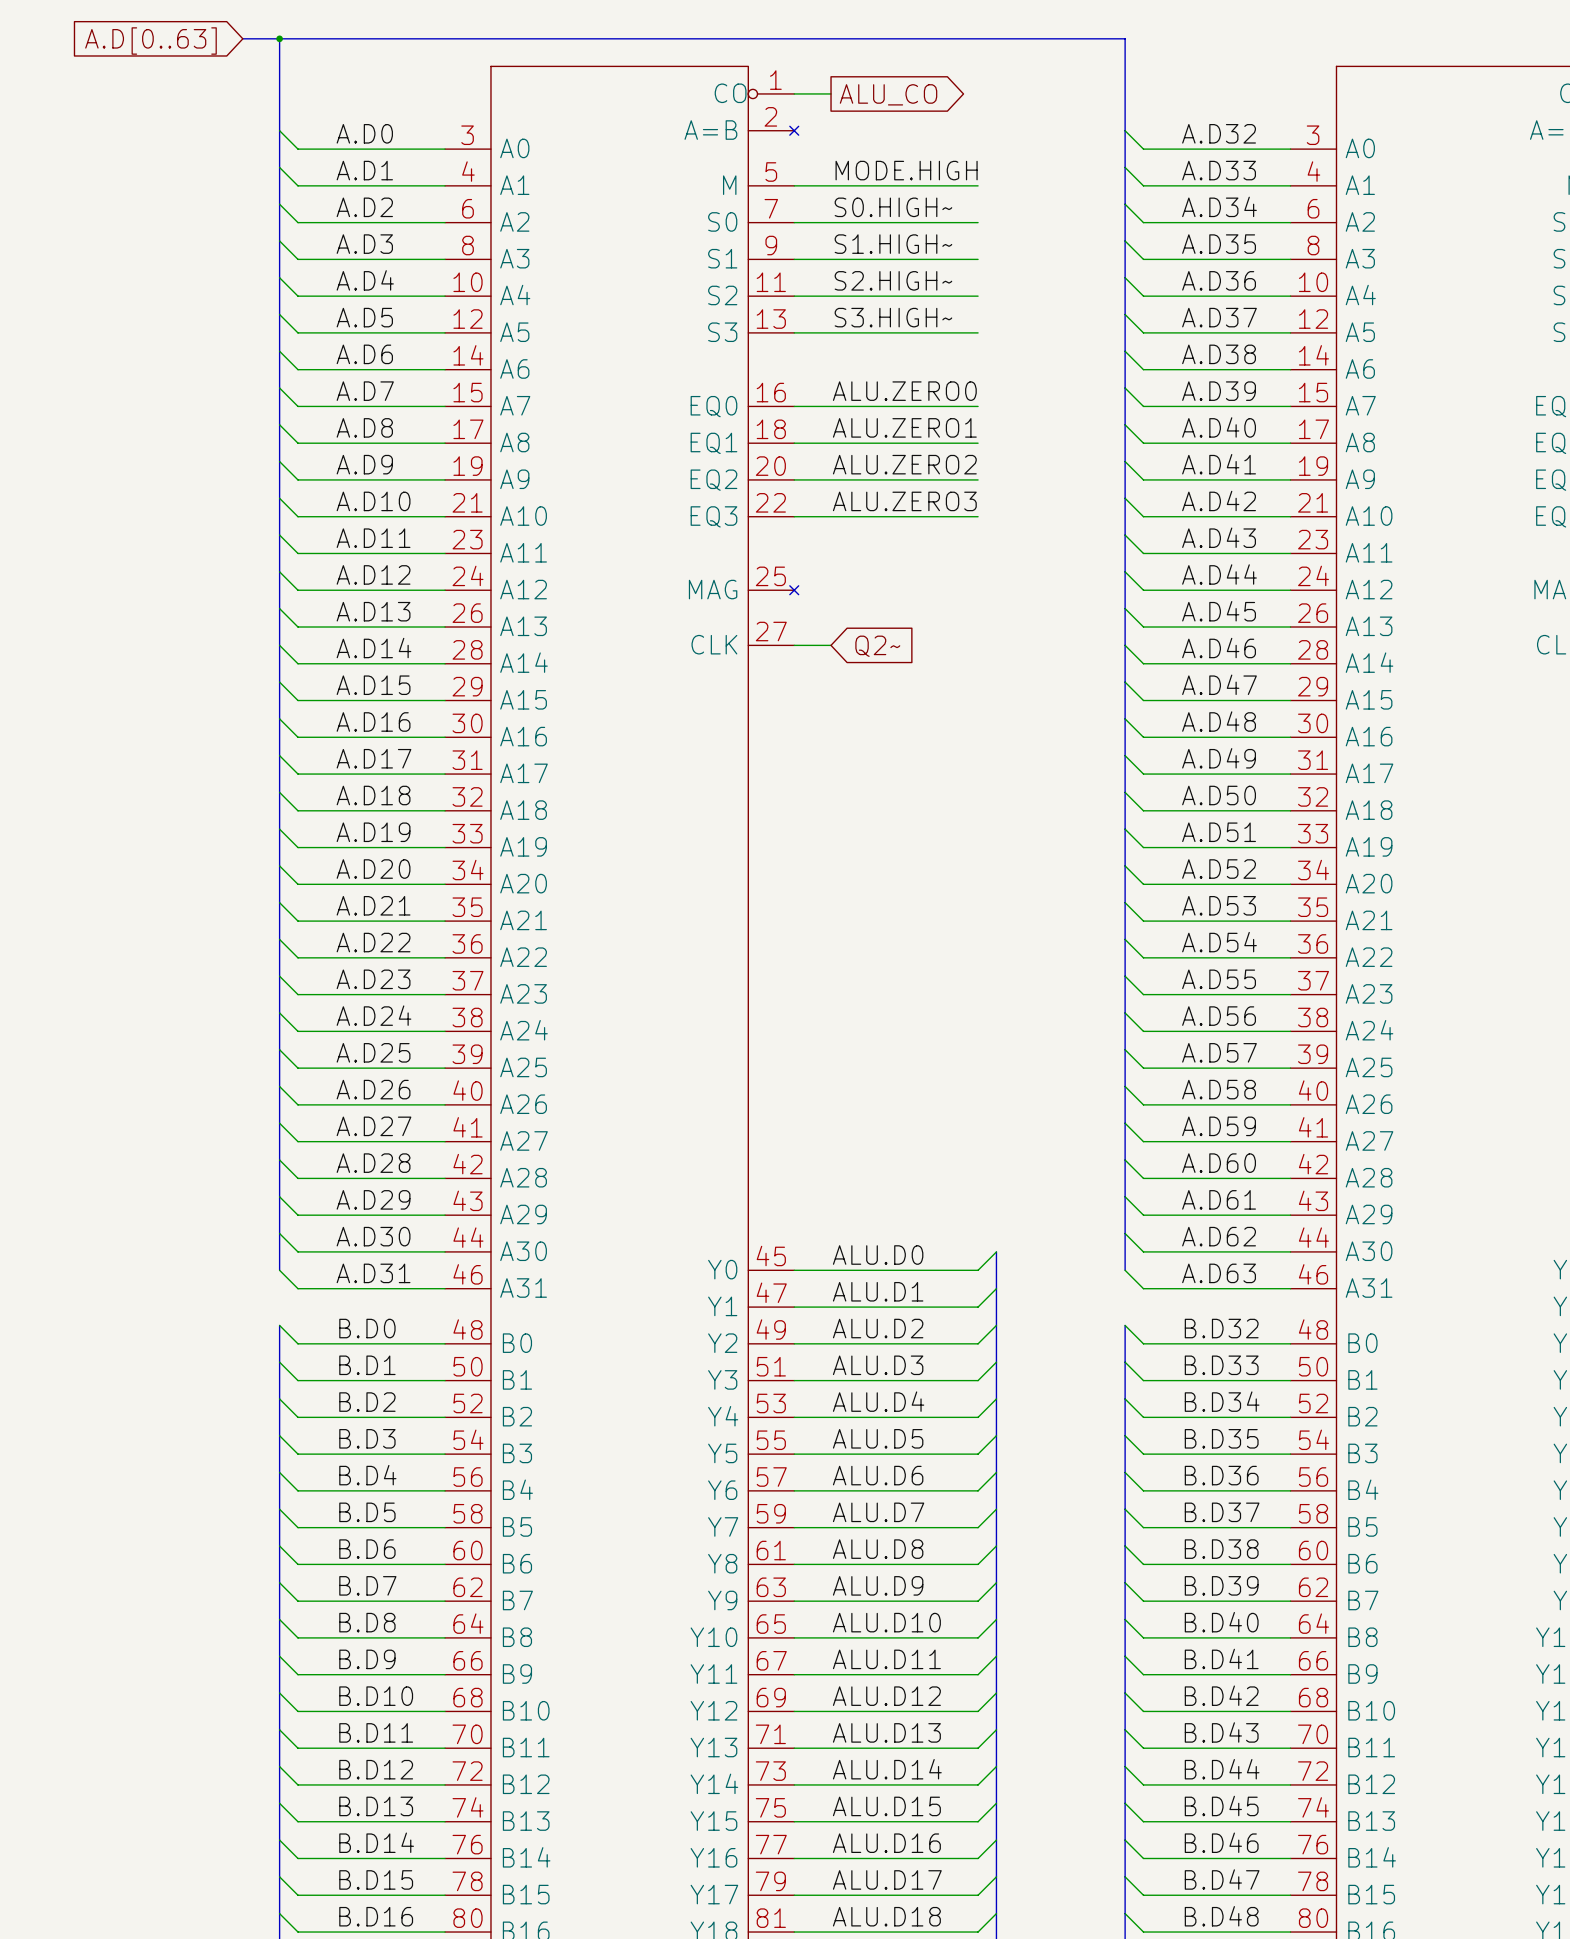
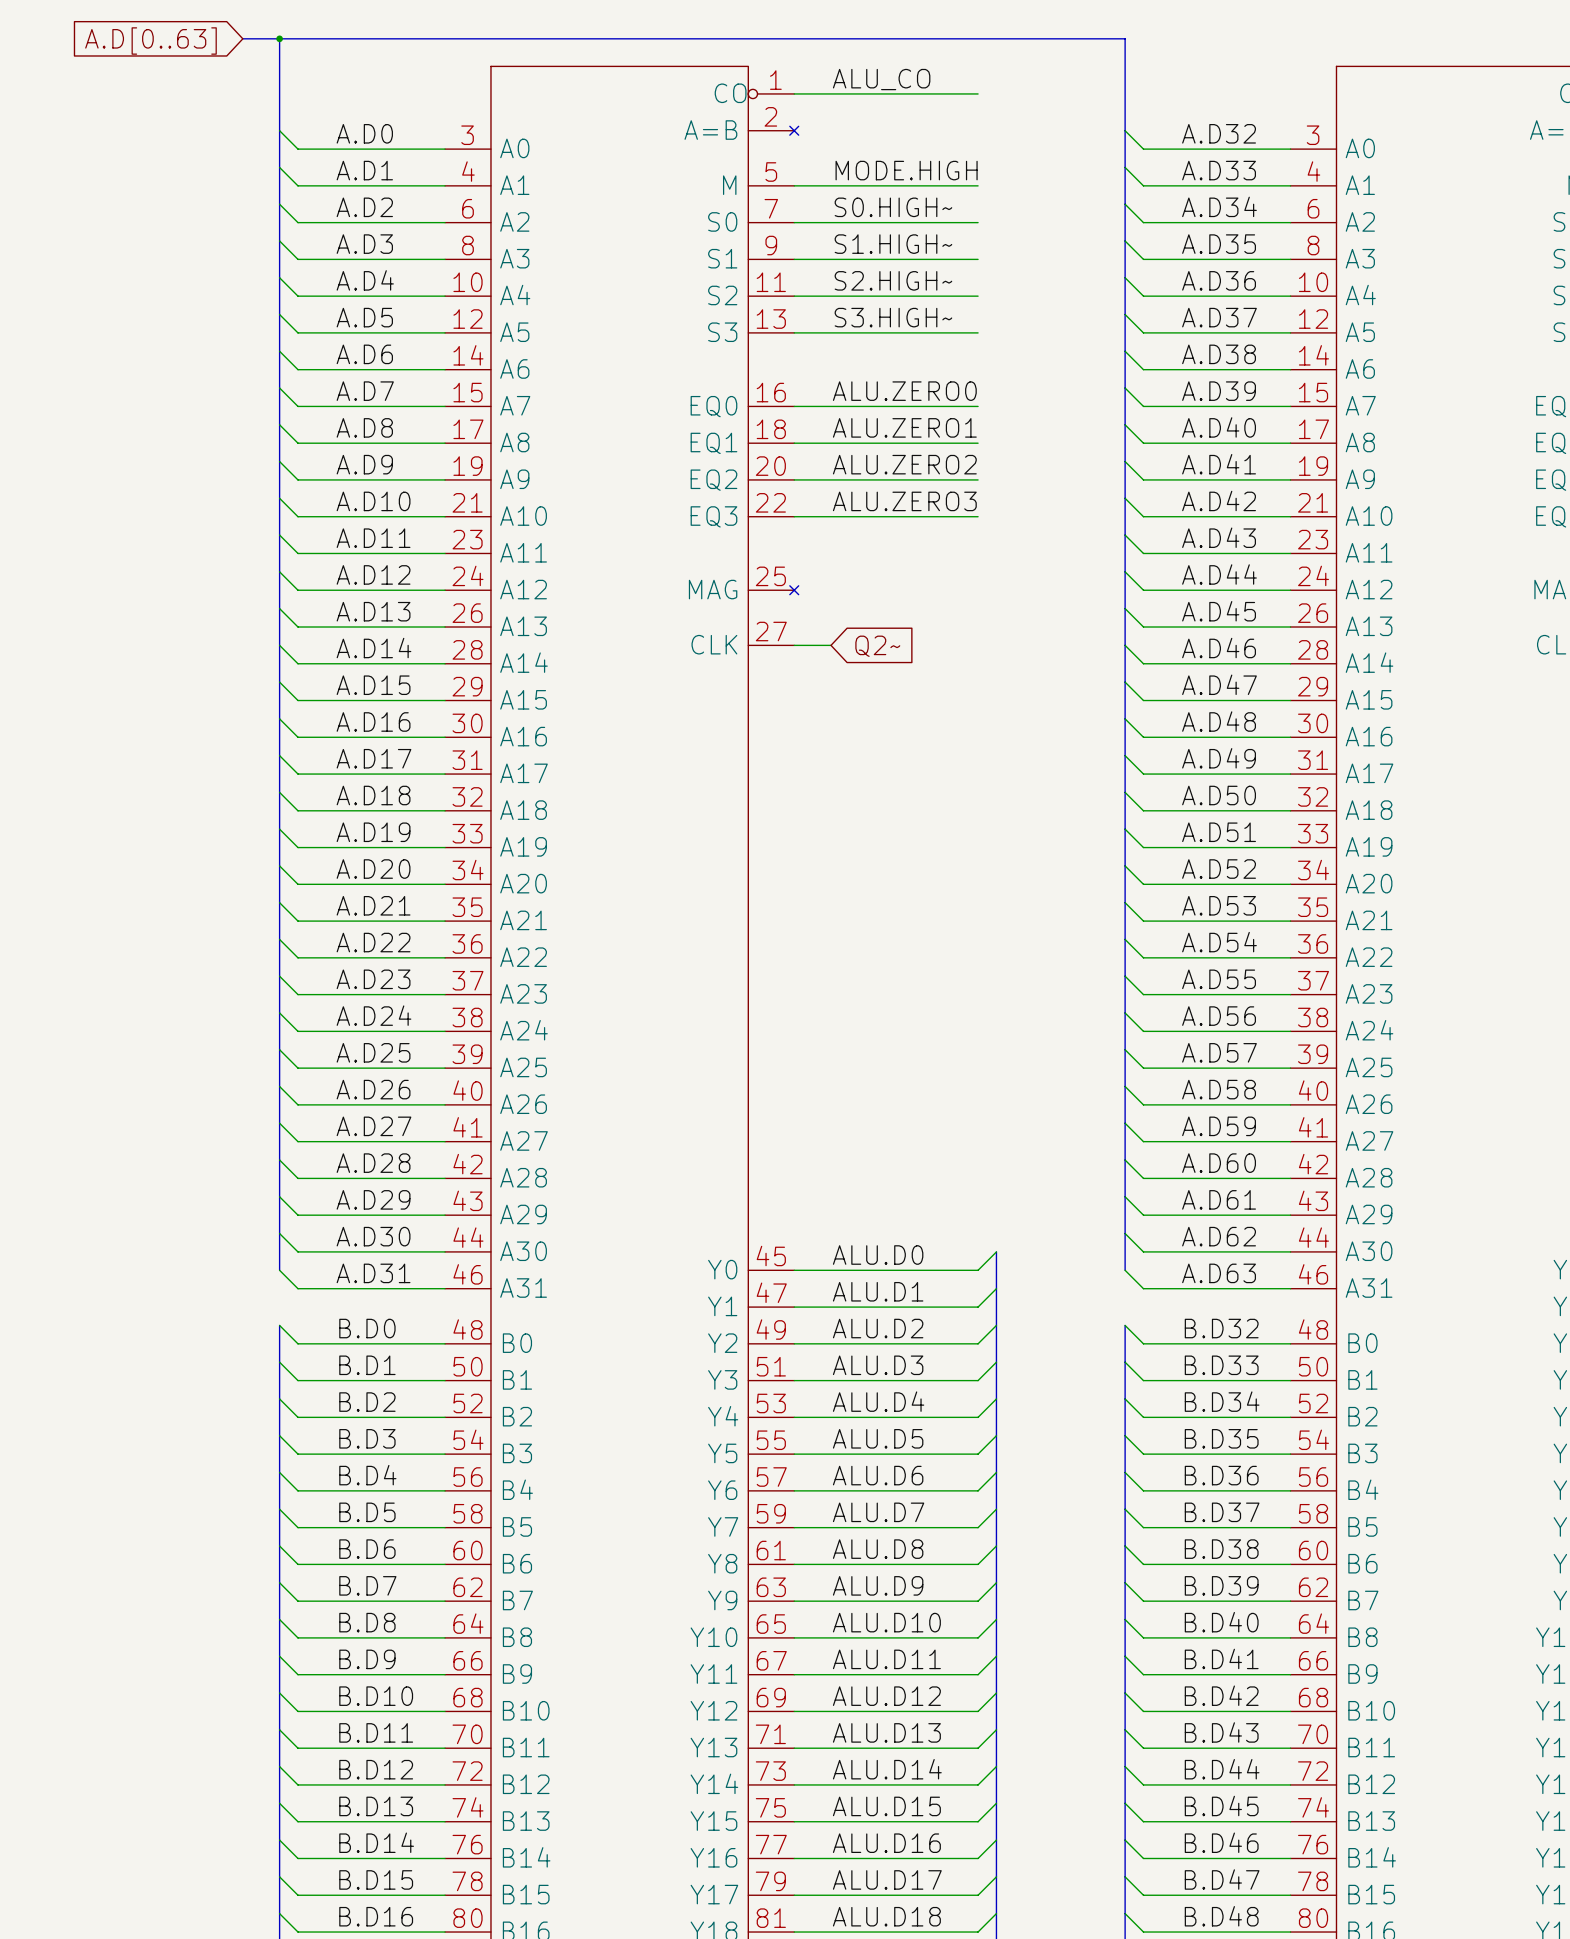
label: none -> ALU_CO (881, 79)
wire: none -> (831, 93) (978, 93)
global label: ALU_CO (888, 94) -> none

